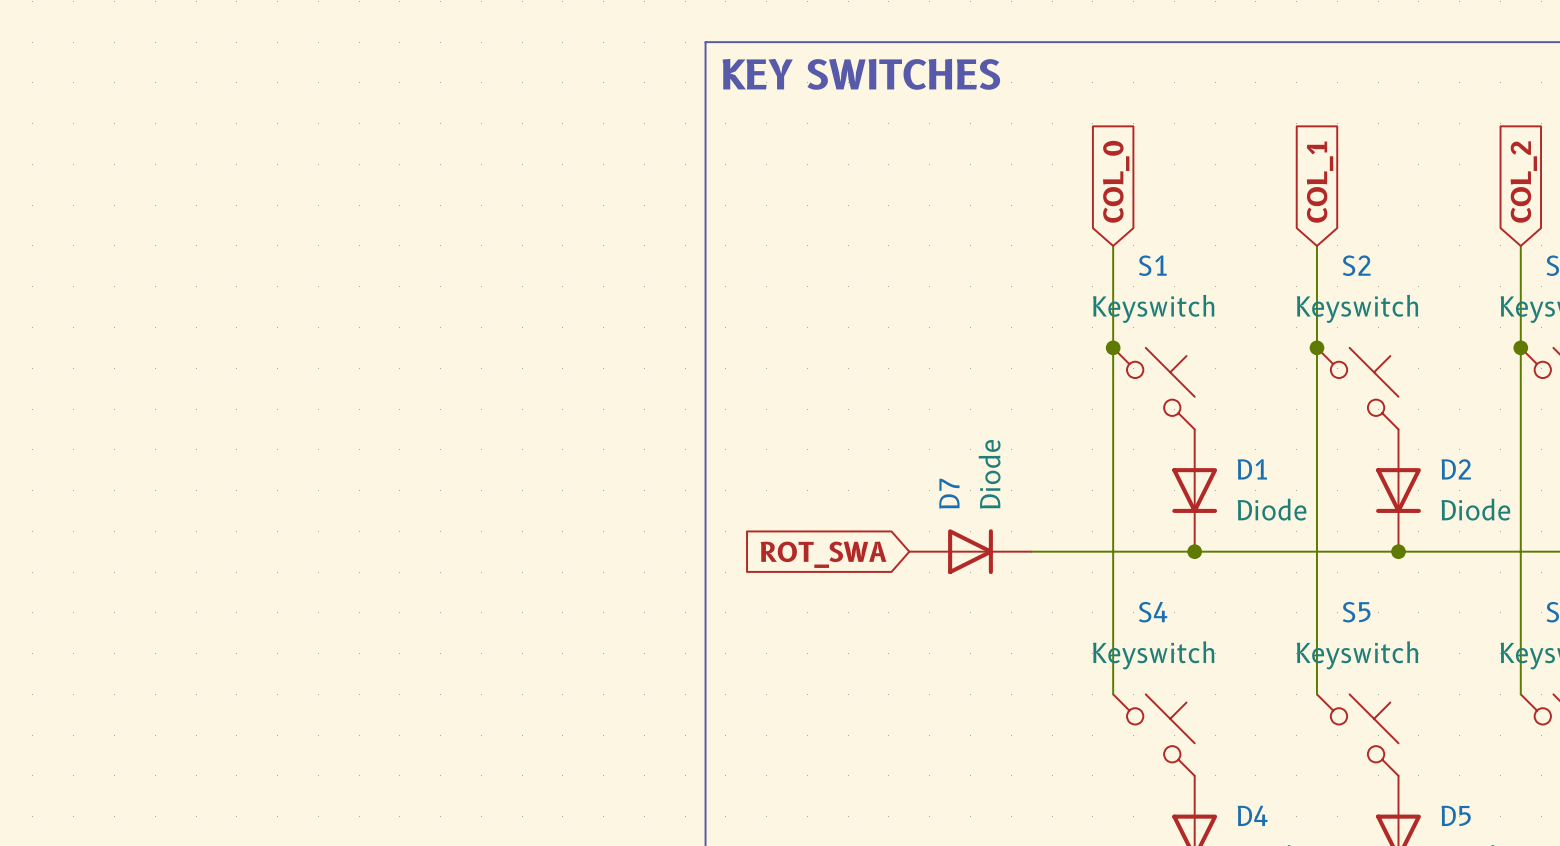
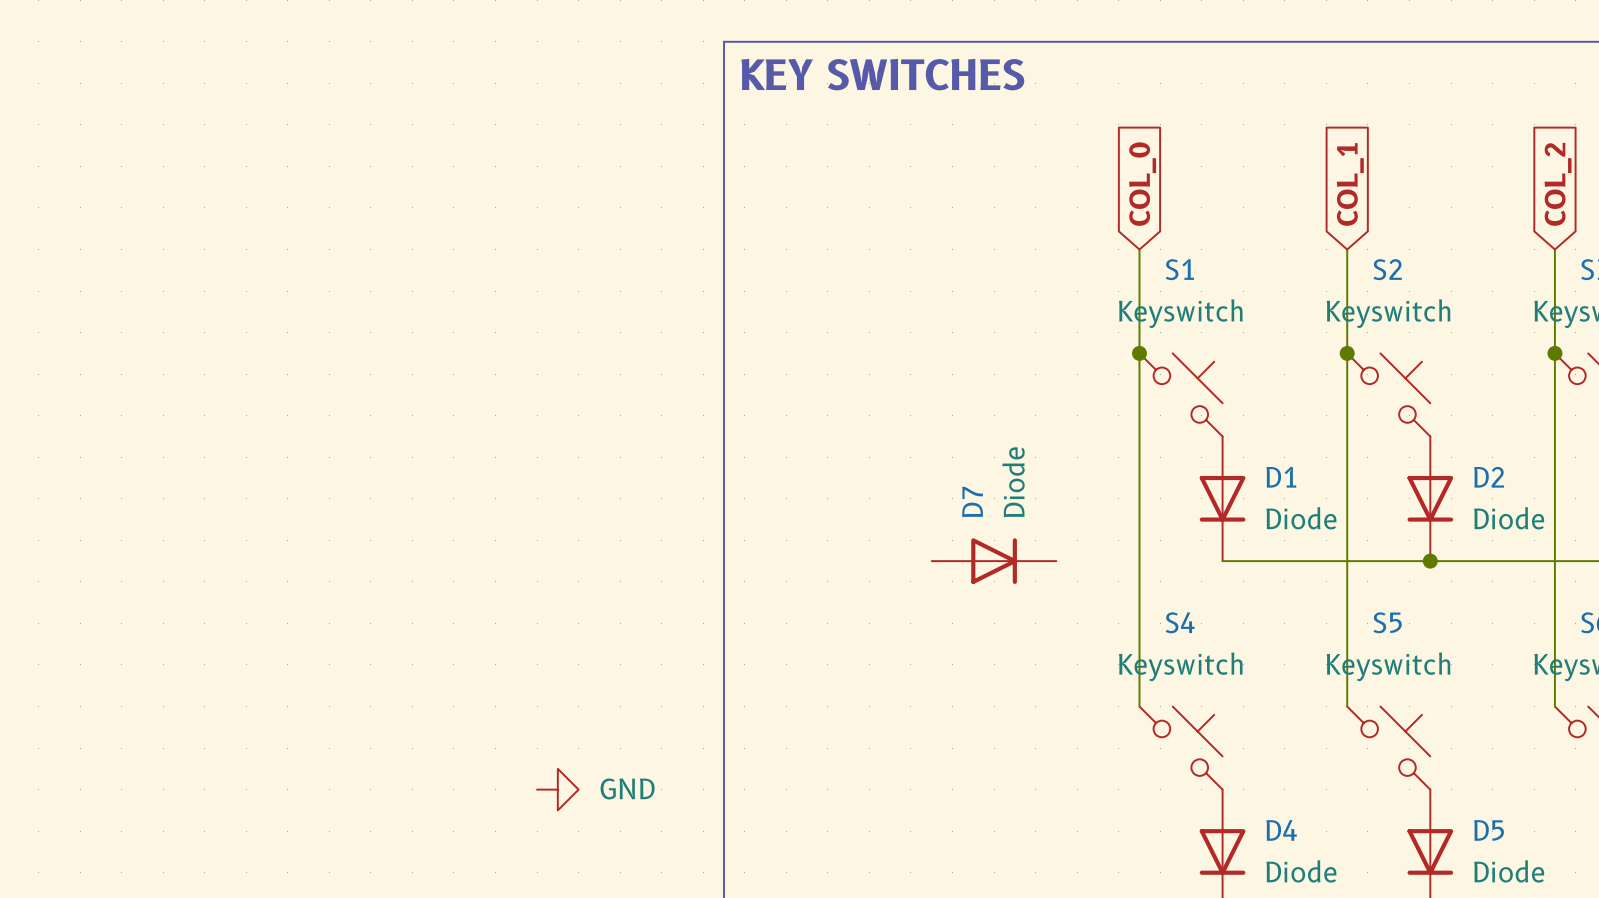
wire: (1031, 551) (1194, 551) -> none
junction: (1194, 551) -> none
global label: ROT_SWA (823, 554) -> none
power symbol: none -> GND (557, 789)

